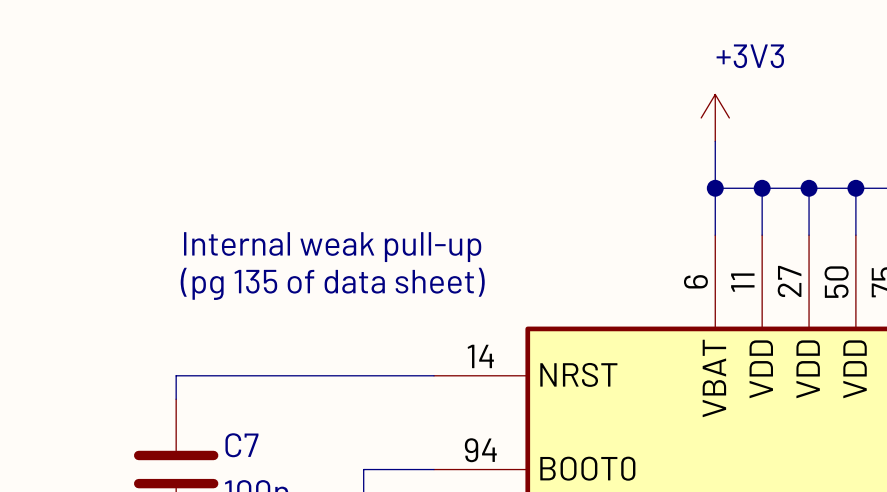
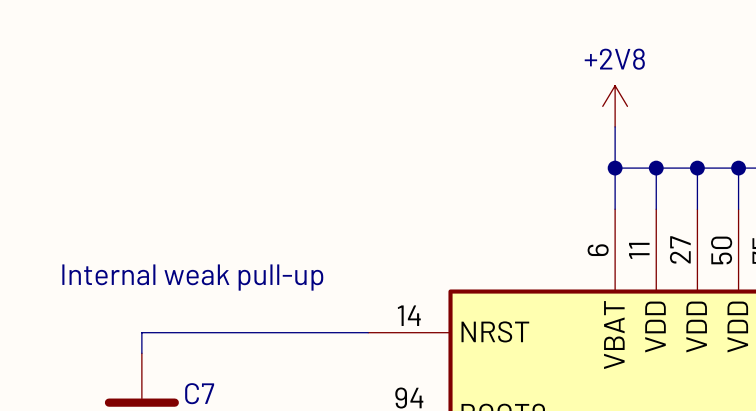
power symbol: +3V3 (715, 117) -> +2V8 (615, 106)
text position: Internal weak pull-up (332, 247) -> Internal weak pull-up (192, 277)
text: (pg 135 of data sheet) (332, 283) -> none

